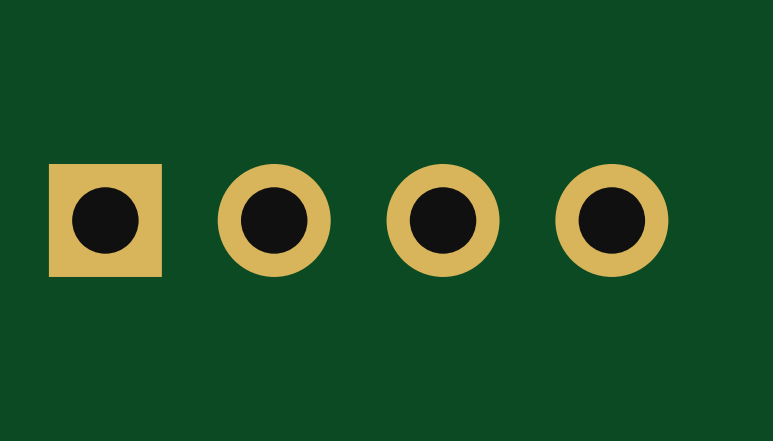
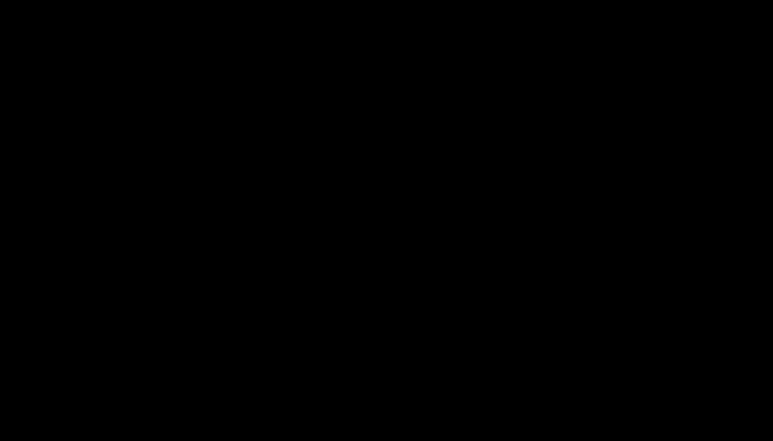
part: (358, 220) -> none

